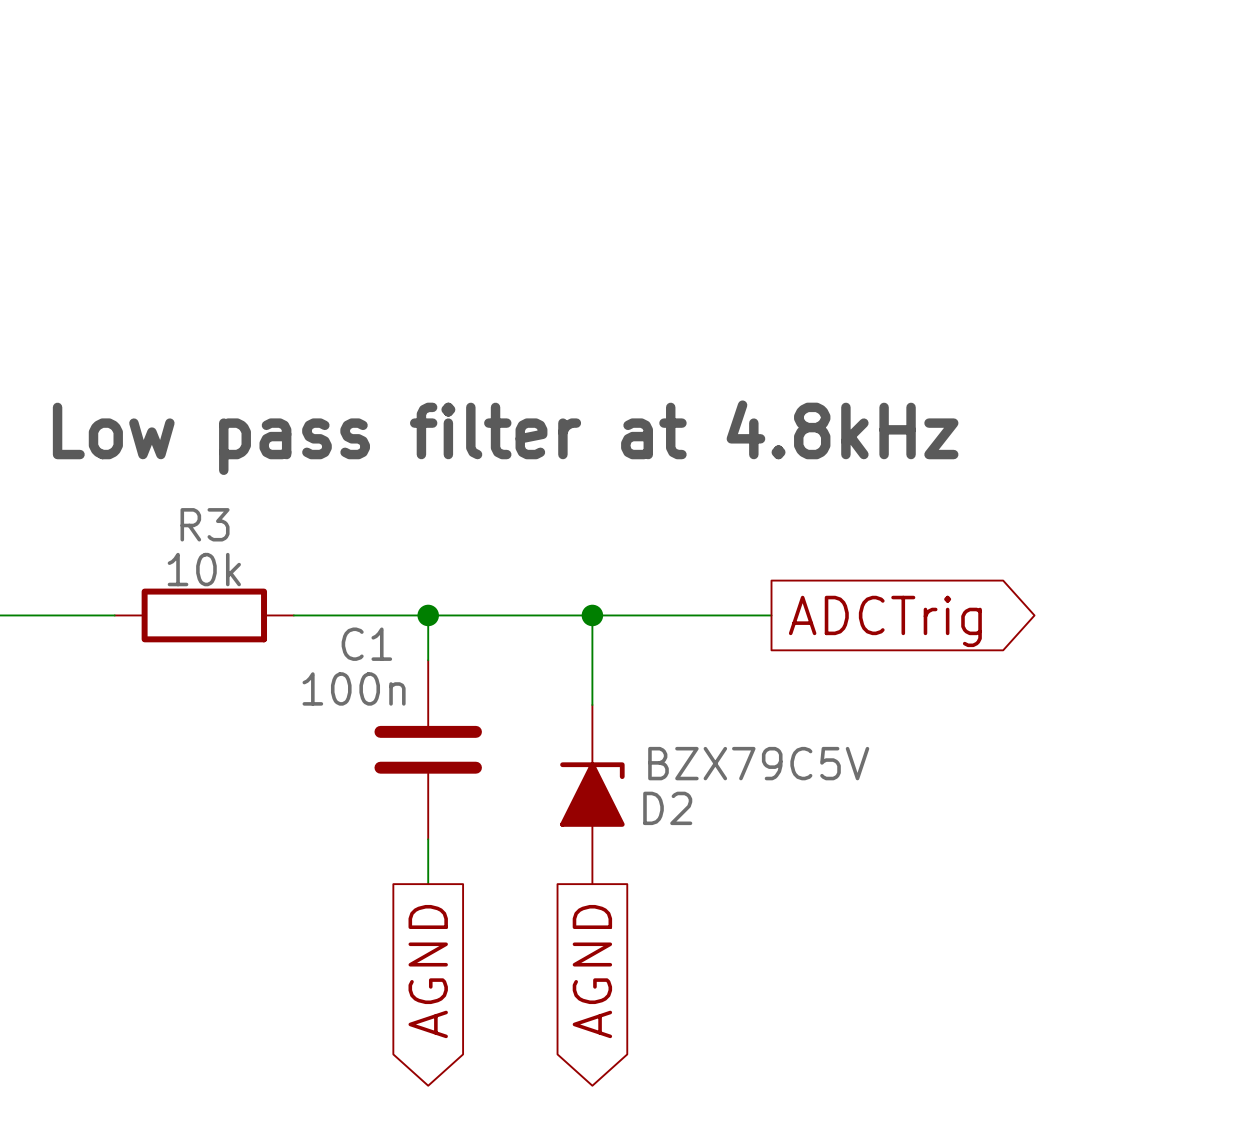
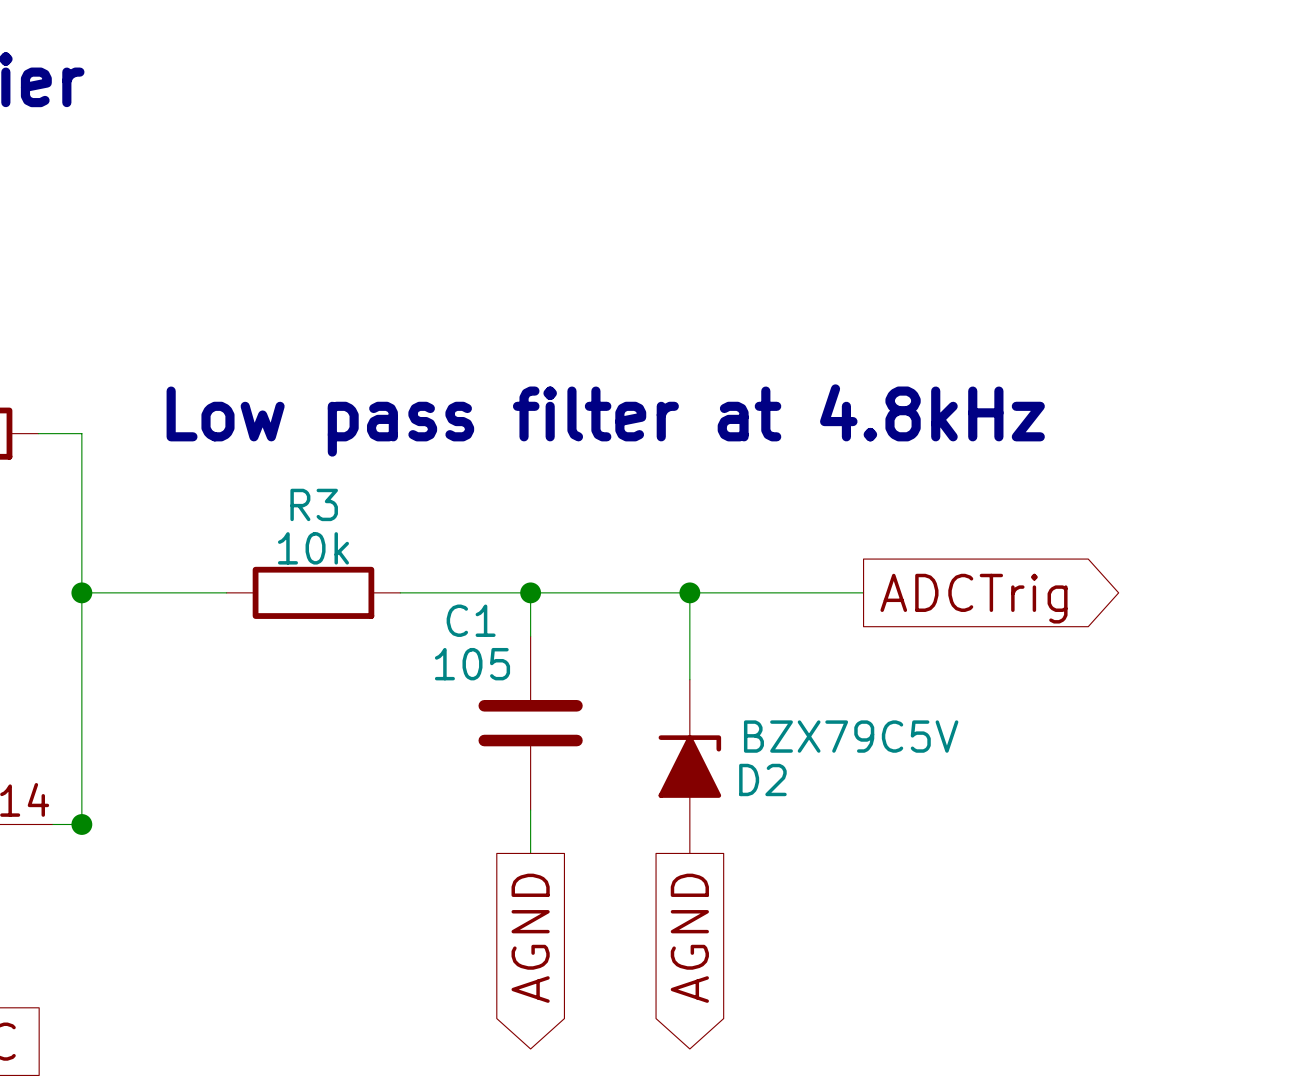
C1 value: 100n (354, 688) -> 105 (472, 664)

